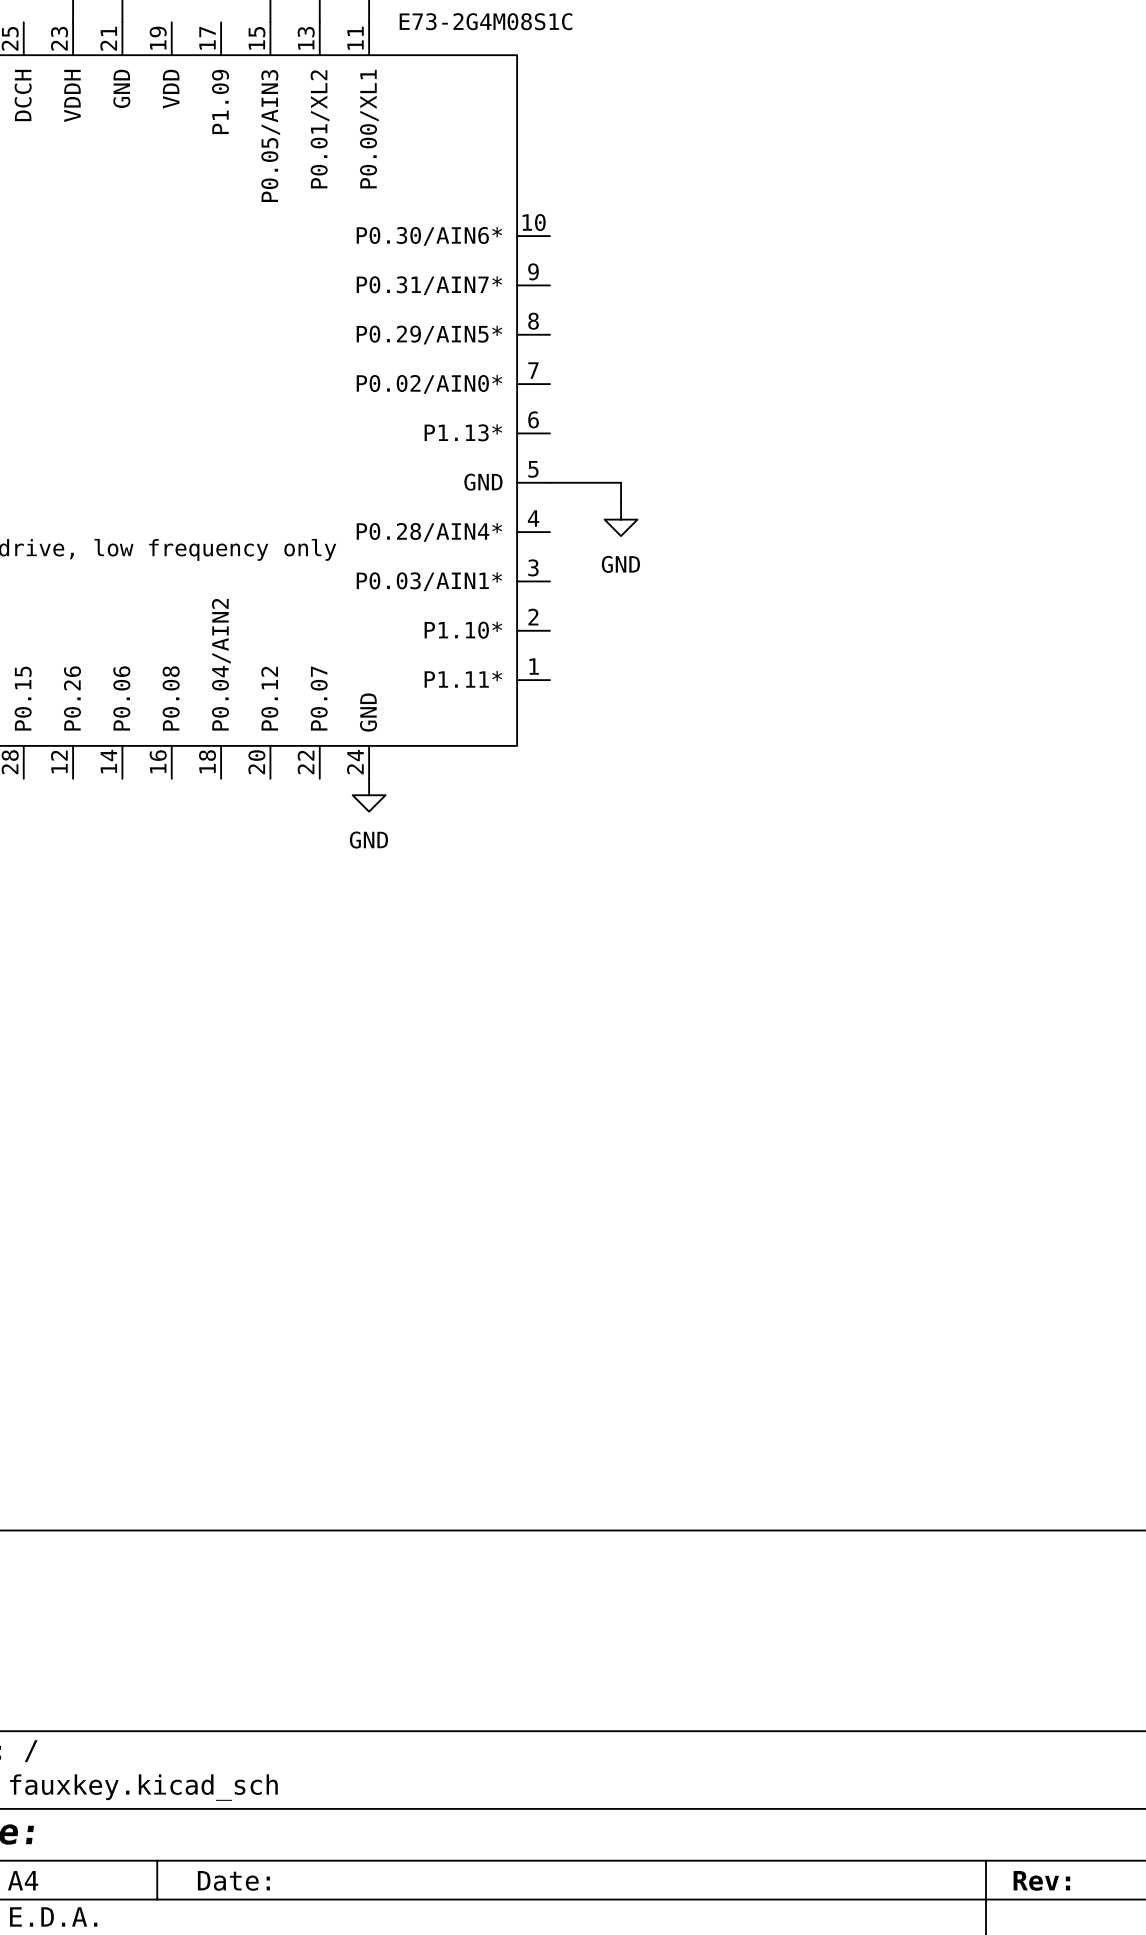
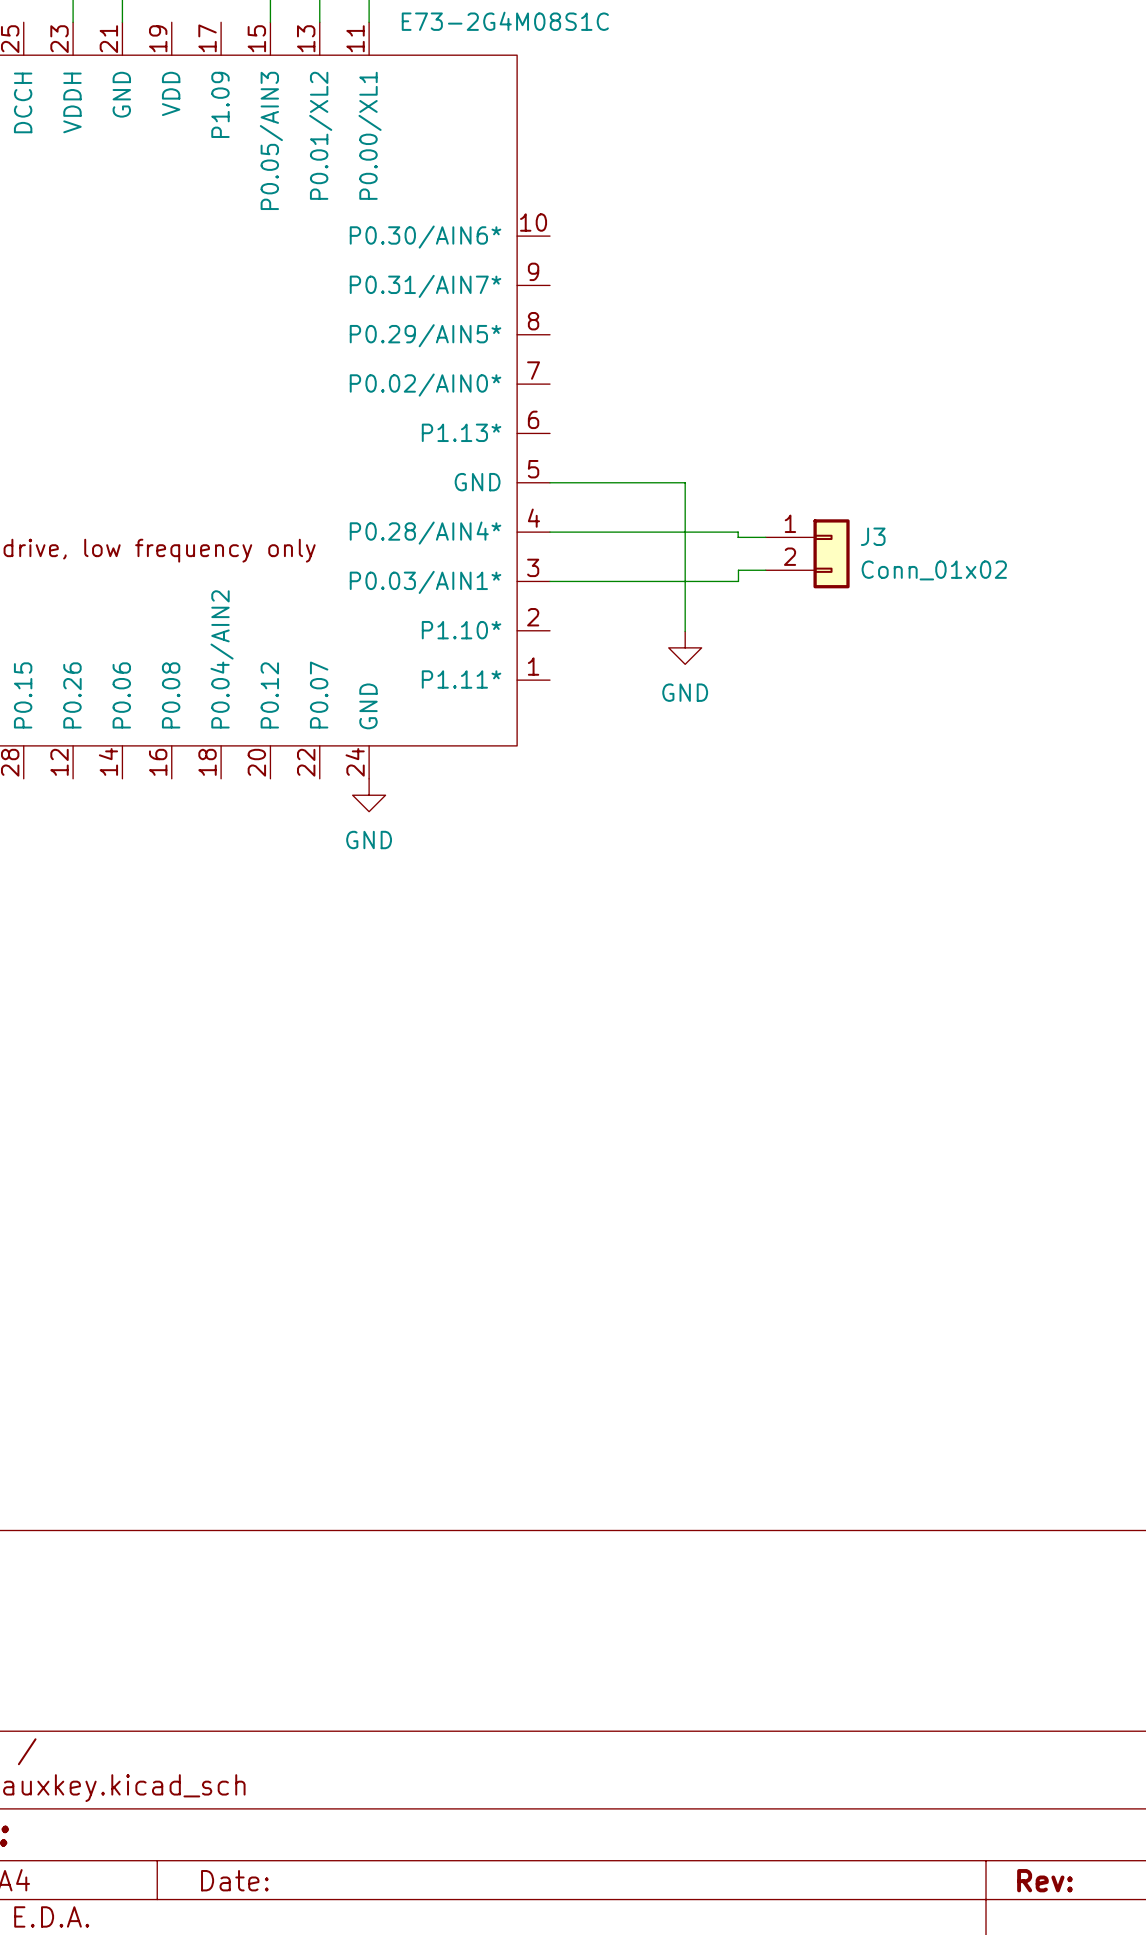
wire: (621, 482) (621, 503) -> (621, 482) (685, 482) (685, 631)
power symbol position: GND (621, 519) -> GND (685, 647)
wire: none -> (550, 532) (738, 532) (738, 537) (765, 537)
J3: none -> Conn_01x02 (807, 553)
wire: none -> (765, 570) (738, 570) (738, 581) (550, 581)

